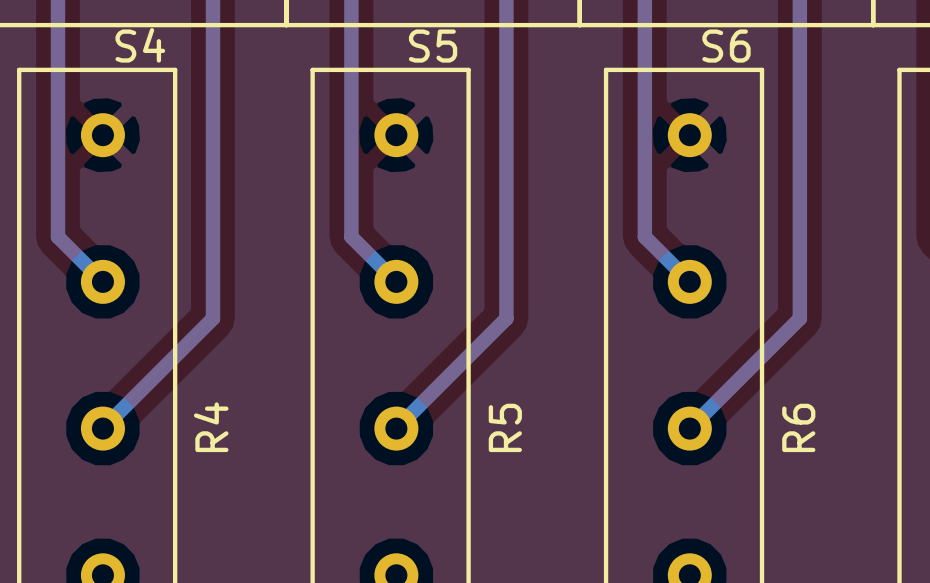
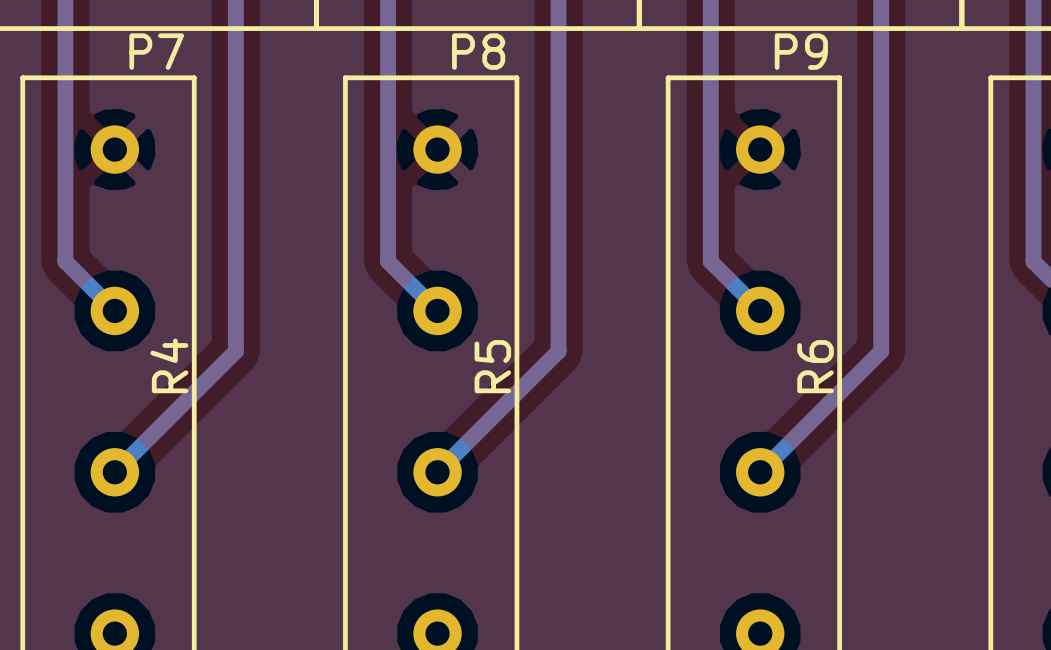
S4 name: S4 (140, 45) -> P7 (156, 51)
S5 name: S5 (433, 46) -> P8 (478, 51)
S6 name: S6 (726, 46) -> P9 (801, 51)
R4 name position: R4 (211, 427) -> R4 (169, 365)
R5 name position: R5 (505, 427) -> R5 (492, 366)
R6 name position: R6 (798, 427) -> R6 (815, 366)

